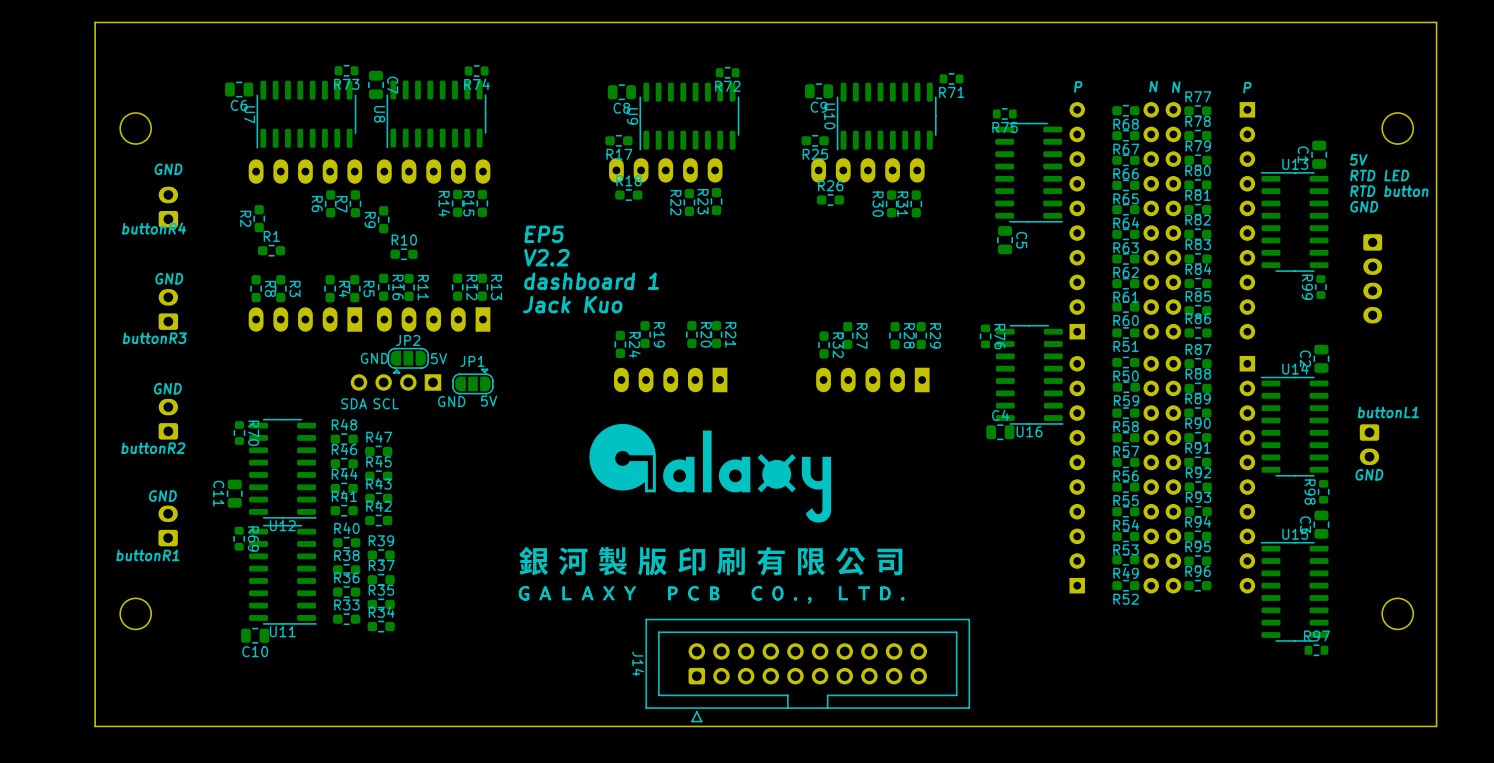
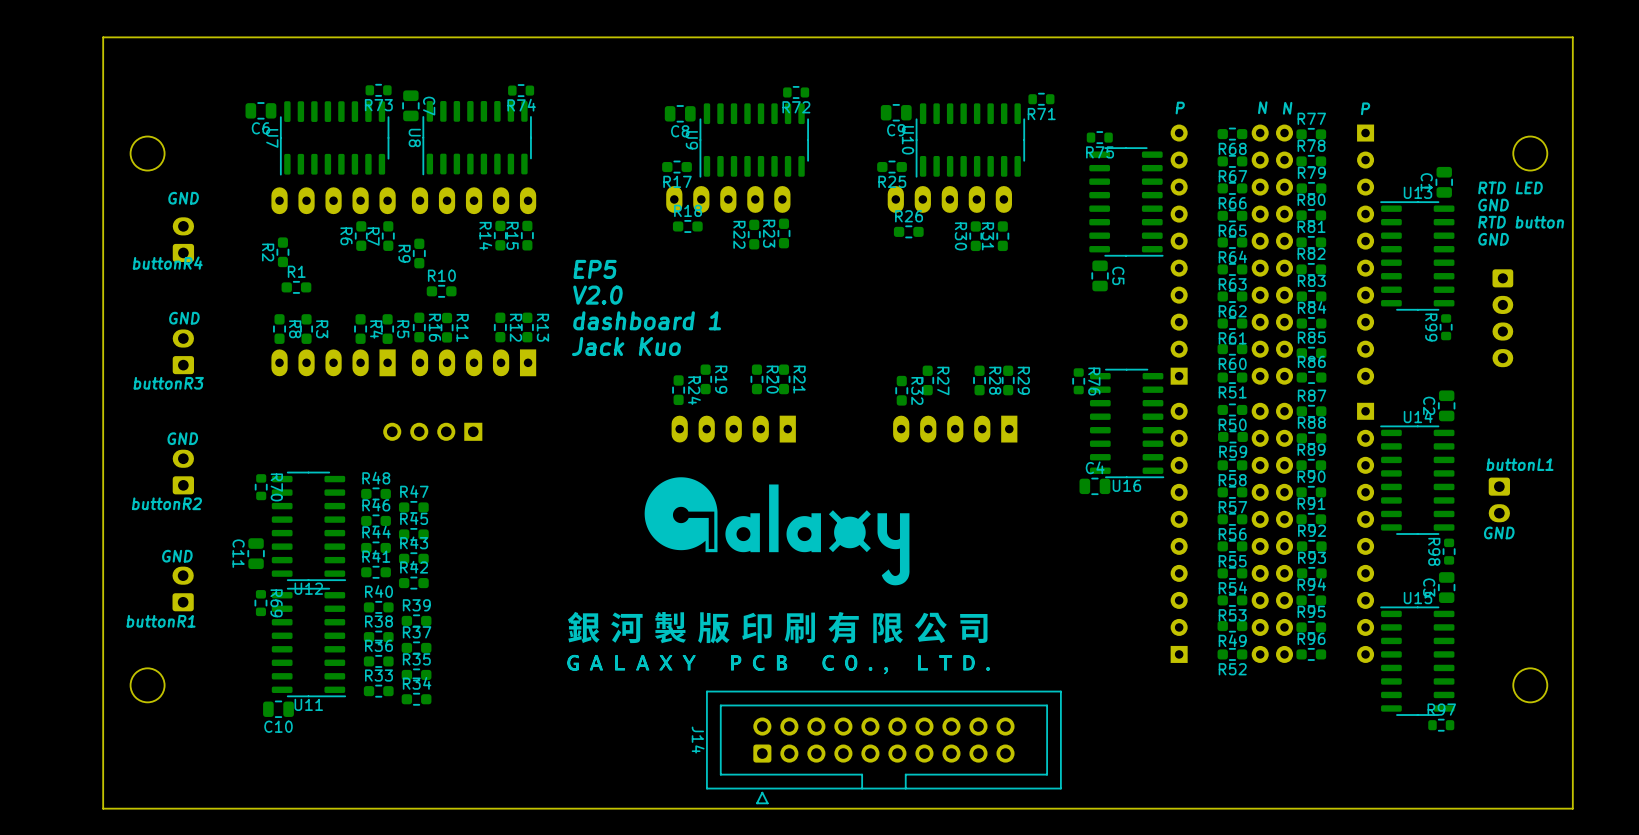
text: 5V (1358, 159) -> RTD LED (1510, 187)
text: RTD LED (1379, 175) -> GND (1493, 205)
text: V2.2 (546, 257) -> V2.0 (597, 295)
text: GND (374, 358) -> none
text: 5V (438, 358) -> none
JP2: (408, 360) -> none
JP1: (472, 381) -> none
text: GND (451, 401) -> none
text: 5V (489, 401) -> none
text: SDA (354, 403) -> none
text: SCL (386, 403) -> none

